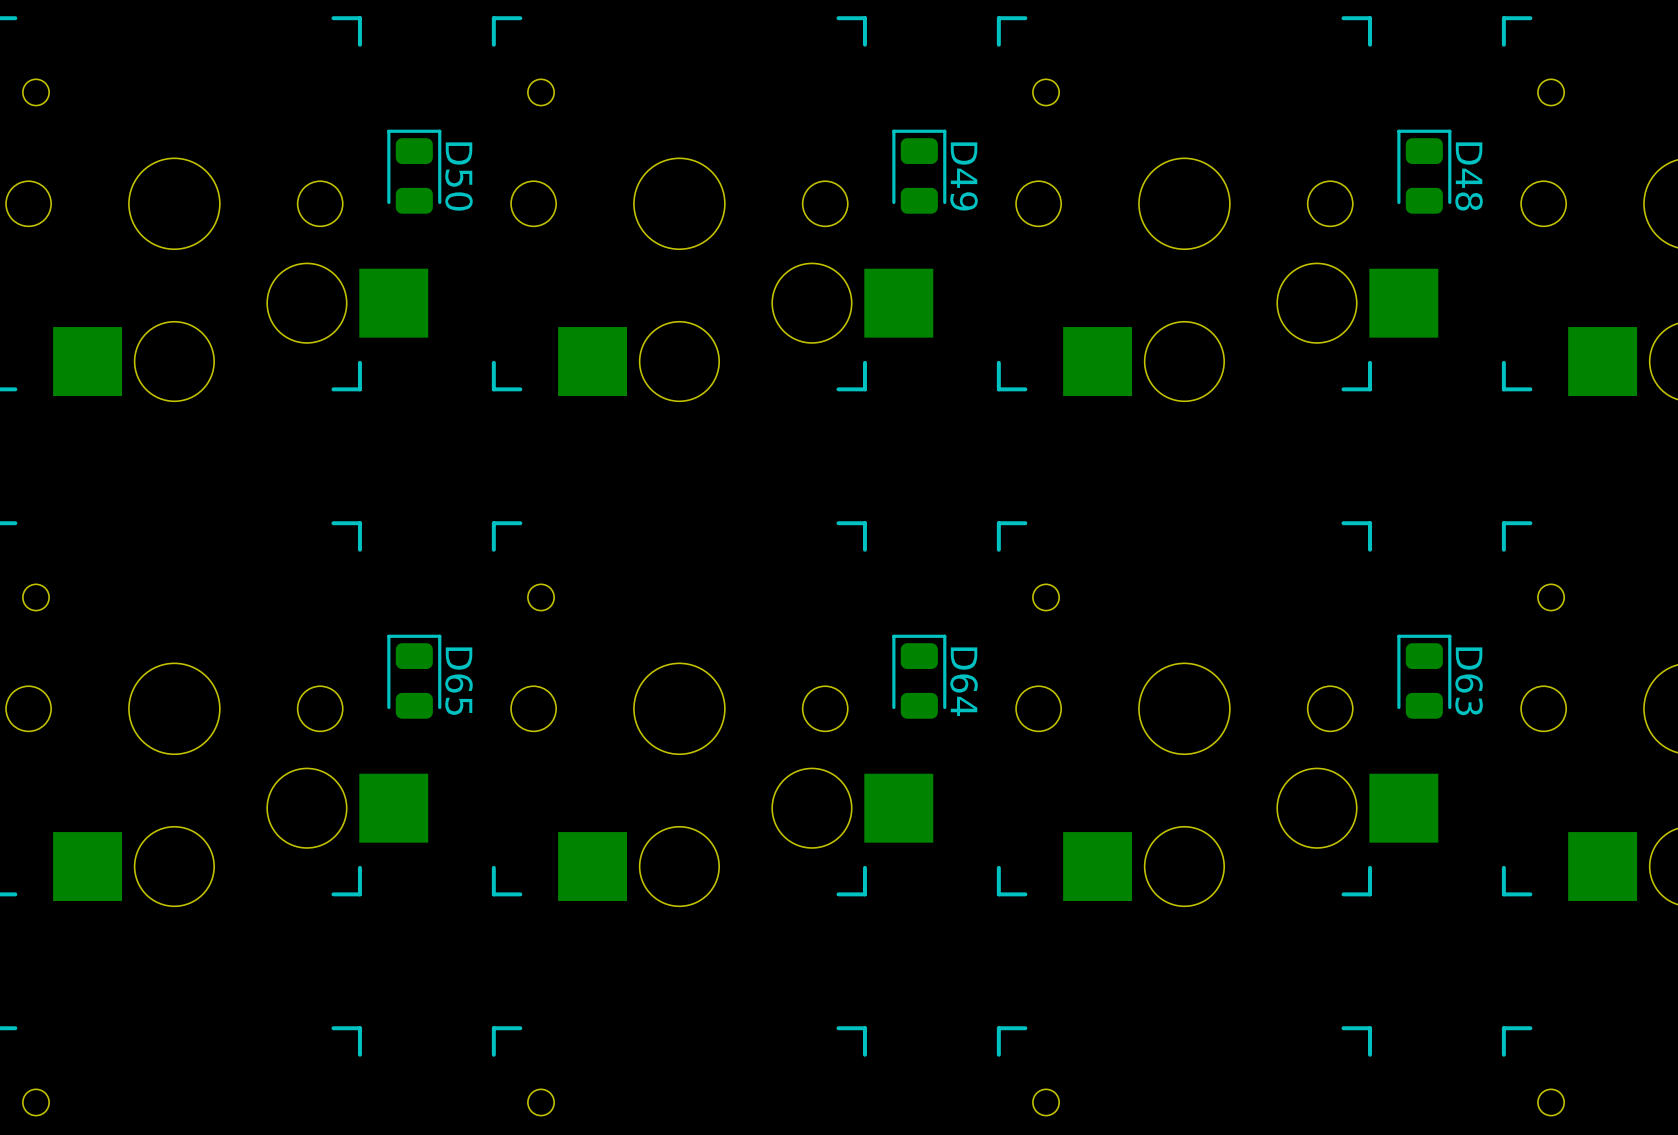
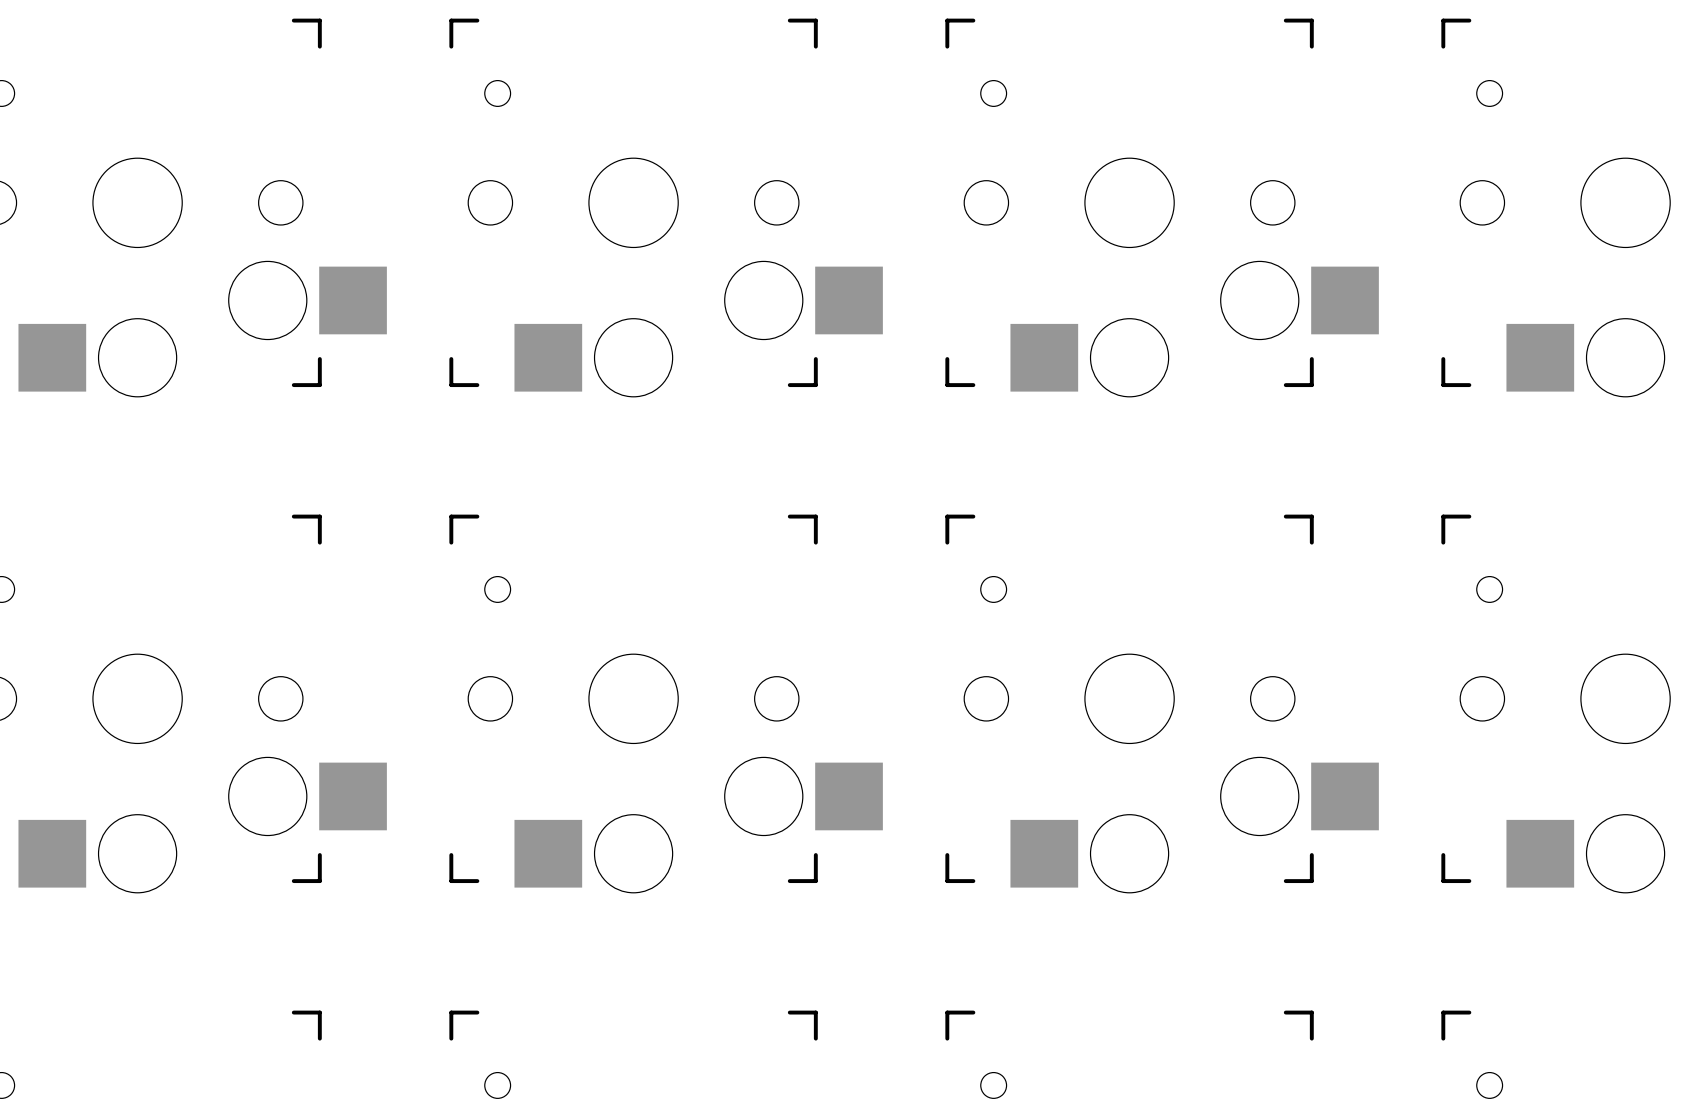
D50: (414, 171) -> none
D49: (919, 171) -> none
D48: (1424, 171) -> none
D65: (414, 676) -> none
D64: (919, 676) -> none
D63: (1424, 676) -> none

